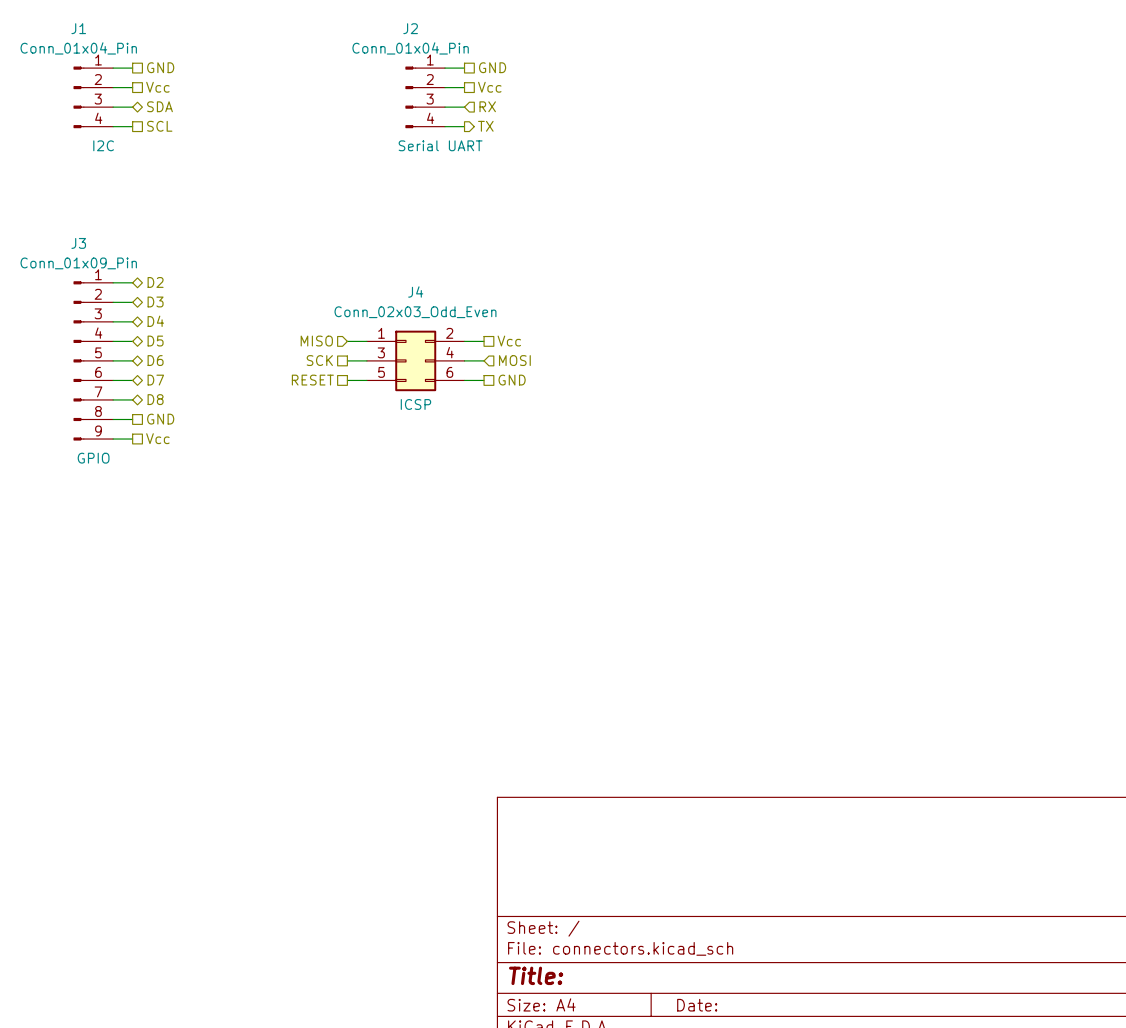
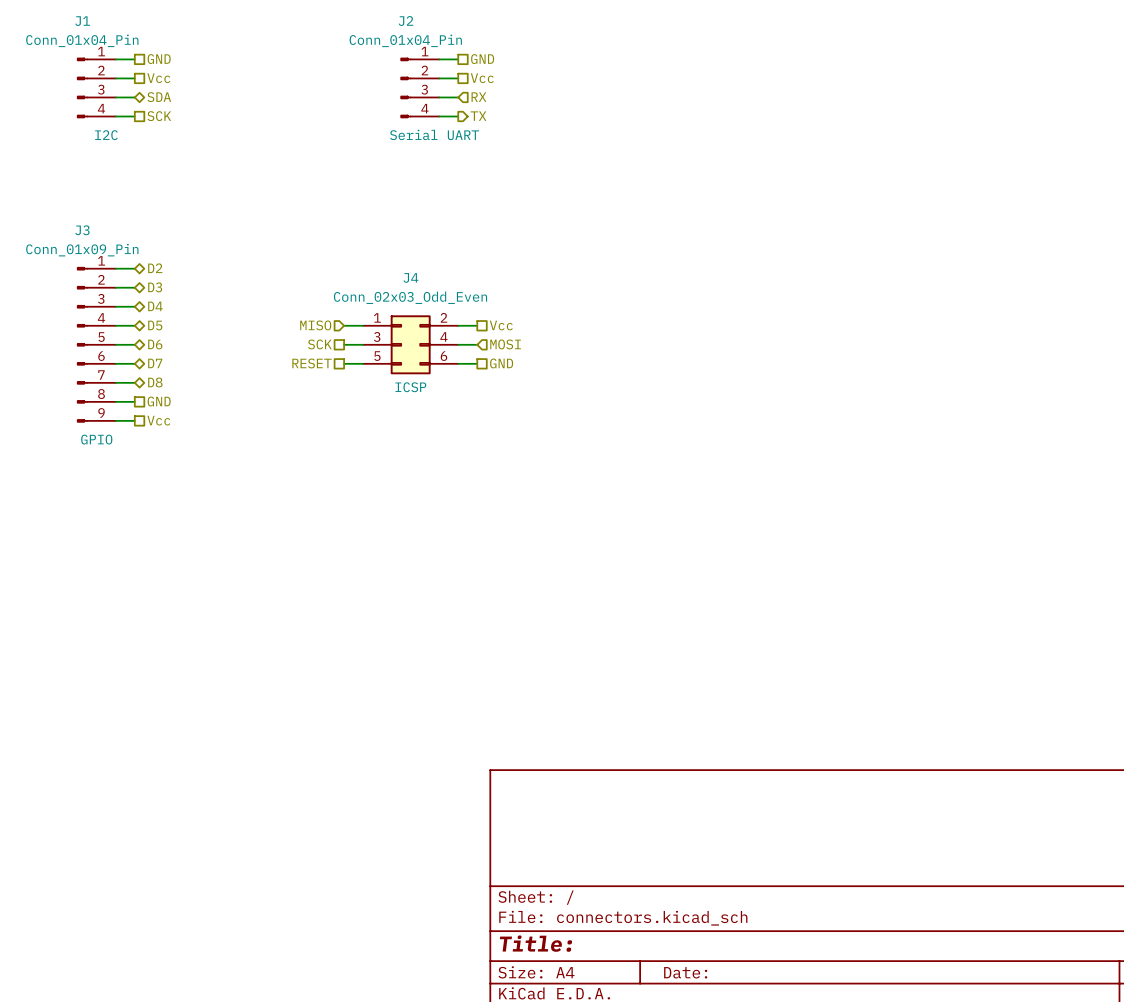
hierarchical label: SCL (159, 126) -> SCK (159, 116)

